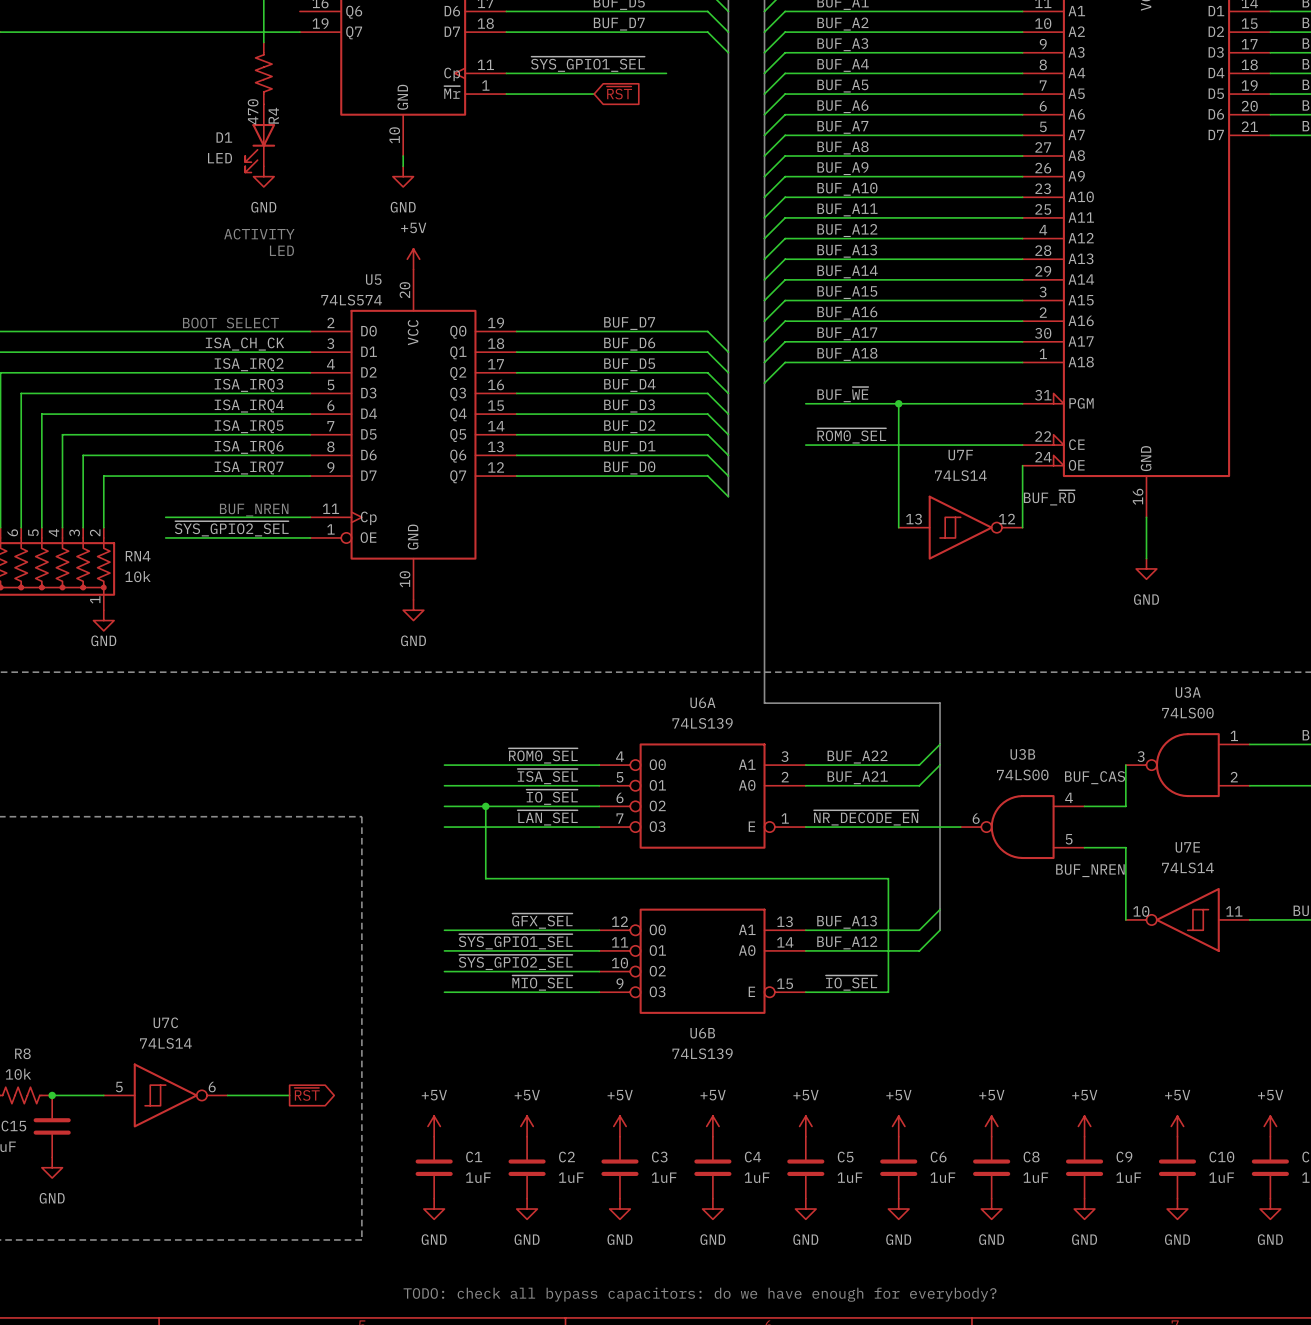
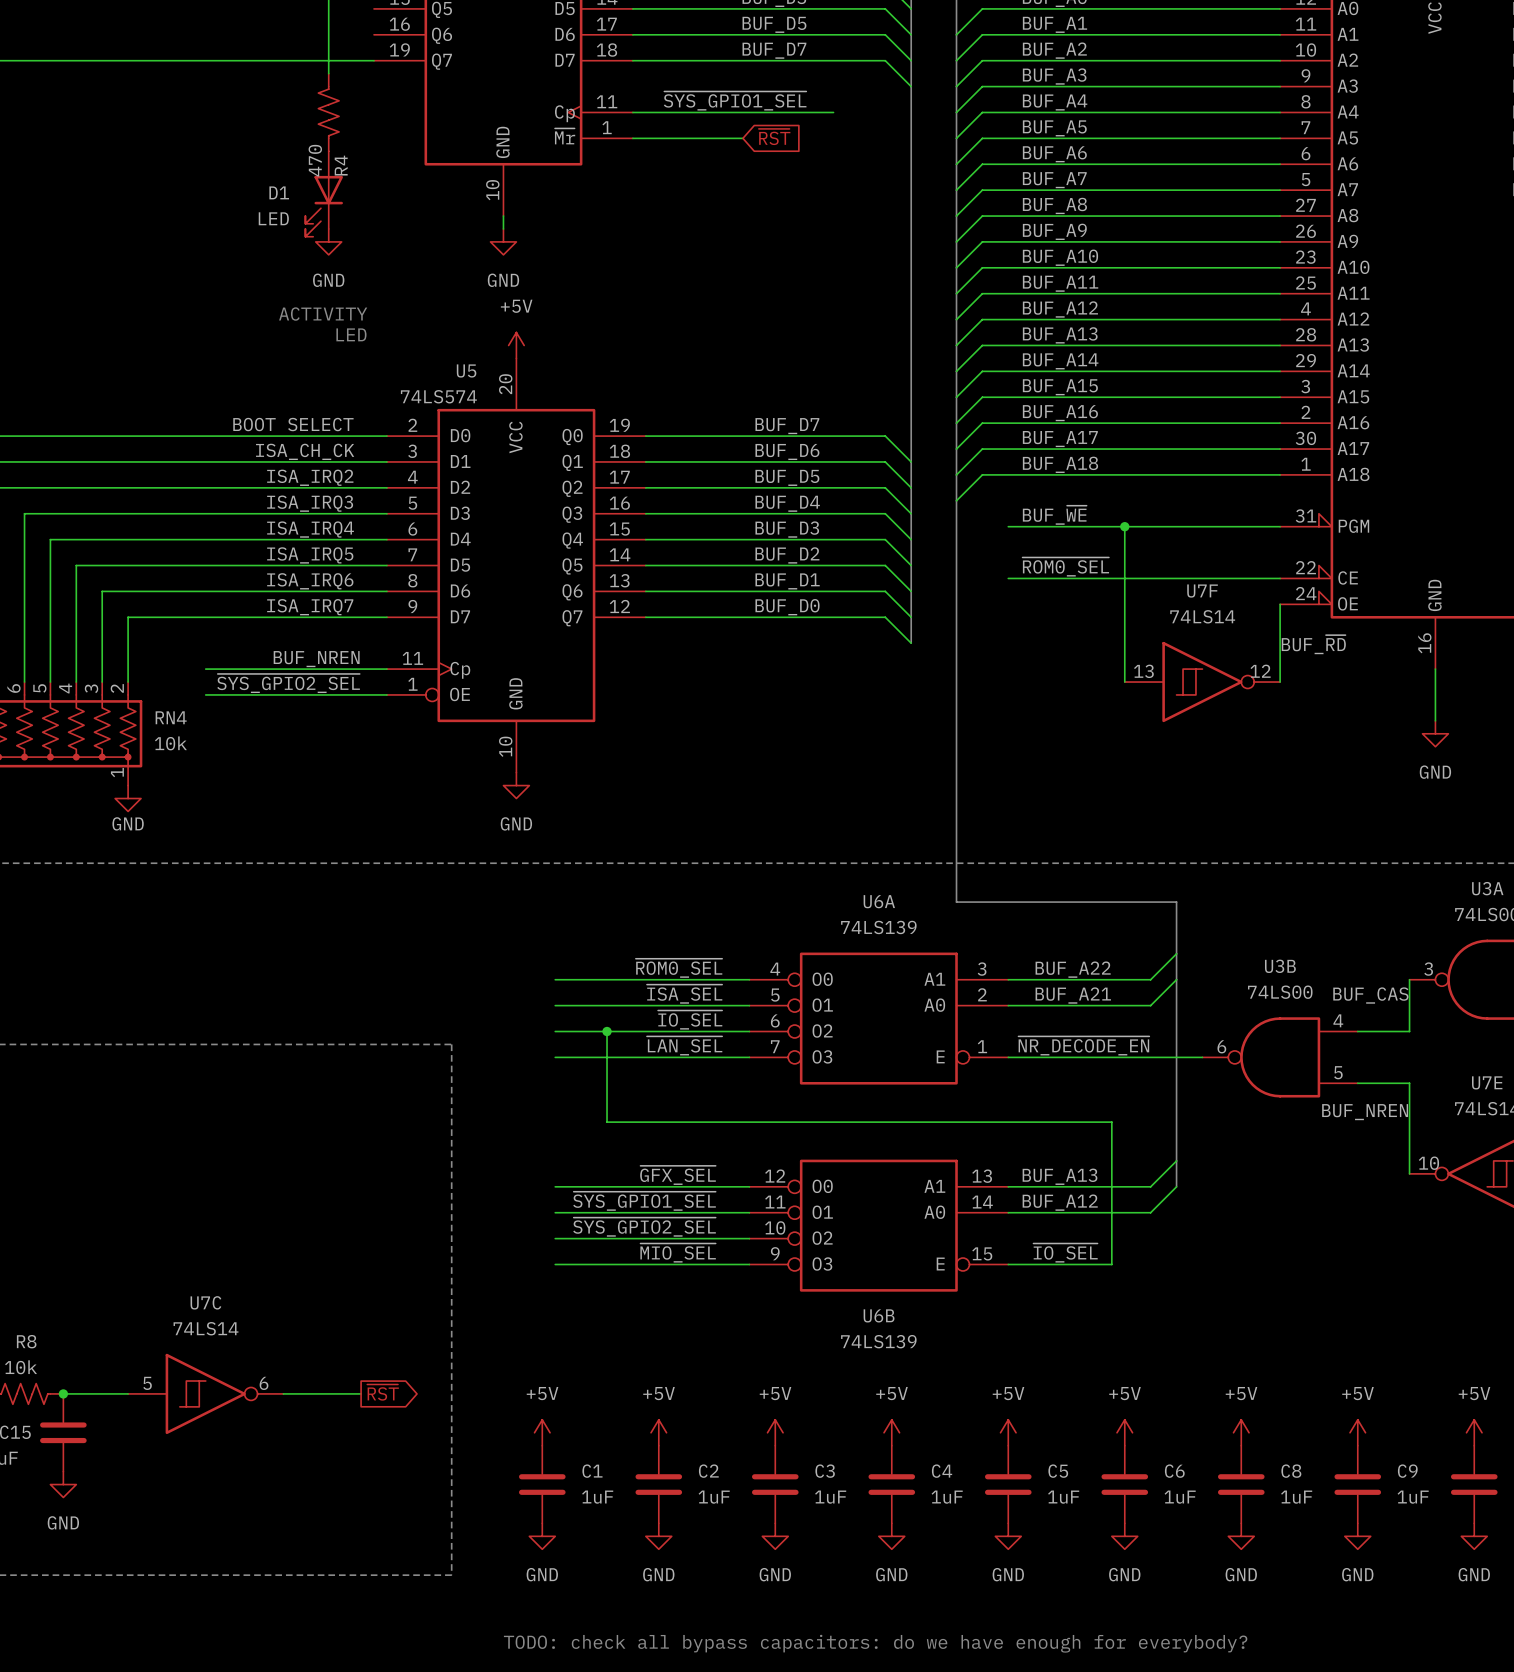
label: none -> BOOT SELECT (293, 424)
text: BOOT SELECT (230, 323) -> none
label: none -> BUF_NREN (316, 659)
text: BUF_NREN (254, 510) -> none

